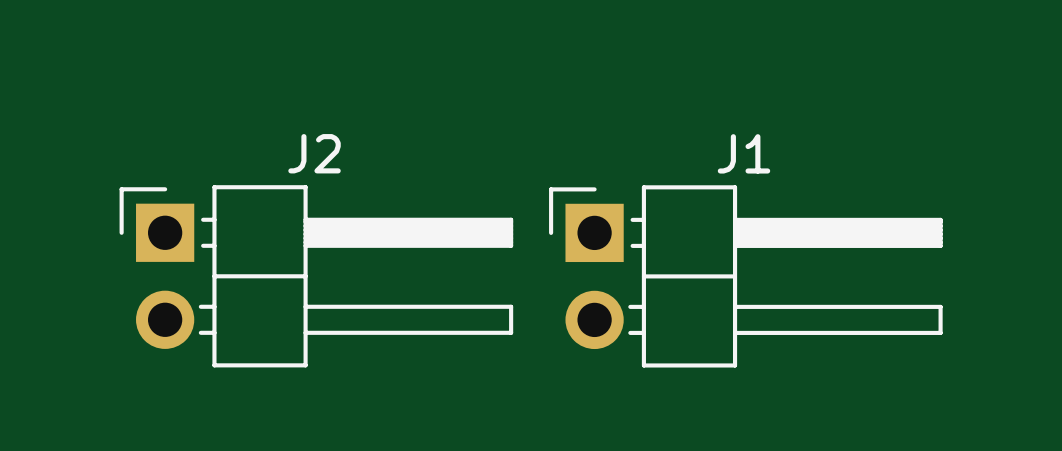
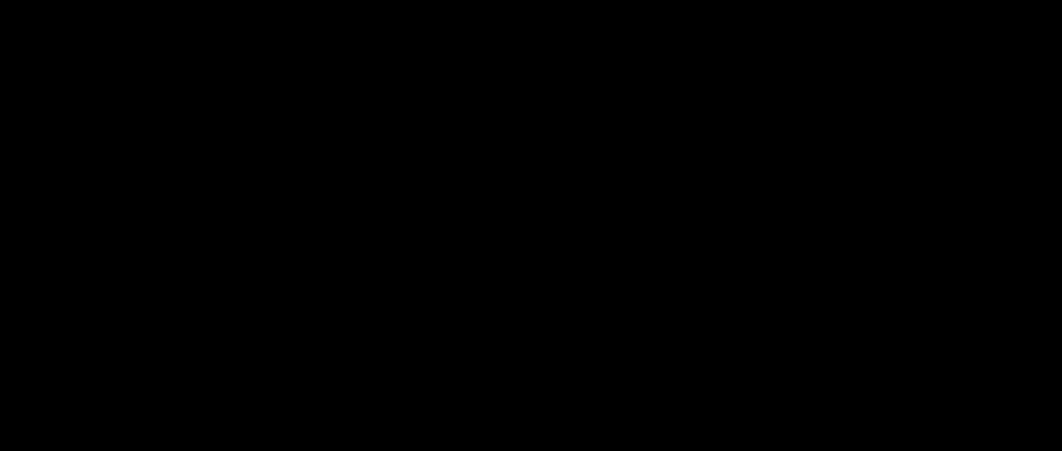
J2: (316, 276) -> none
J1: (745, 276) -> none

